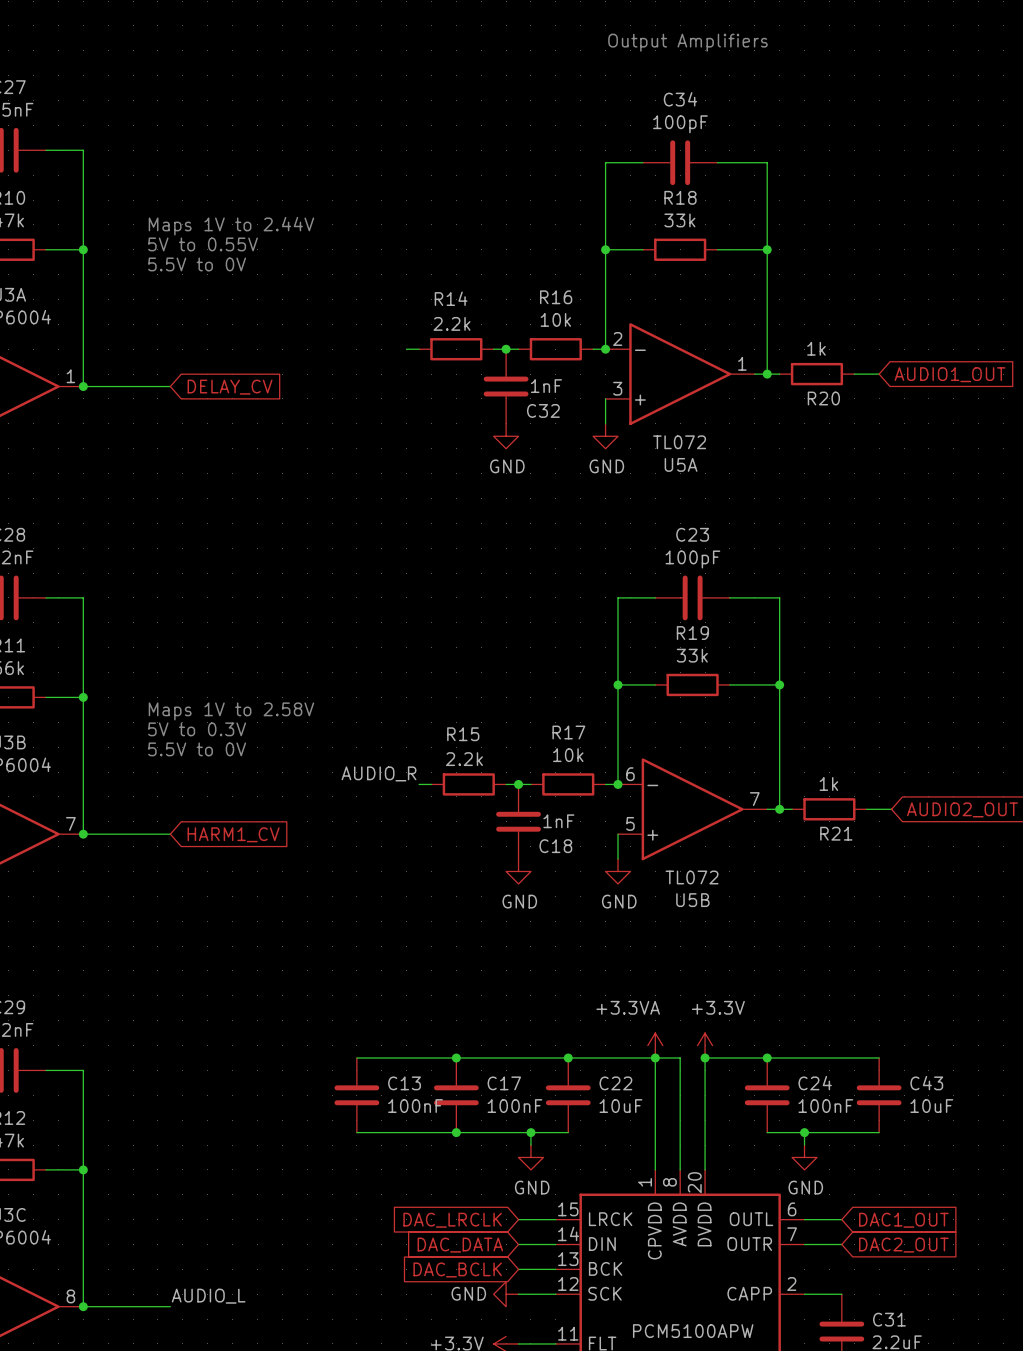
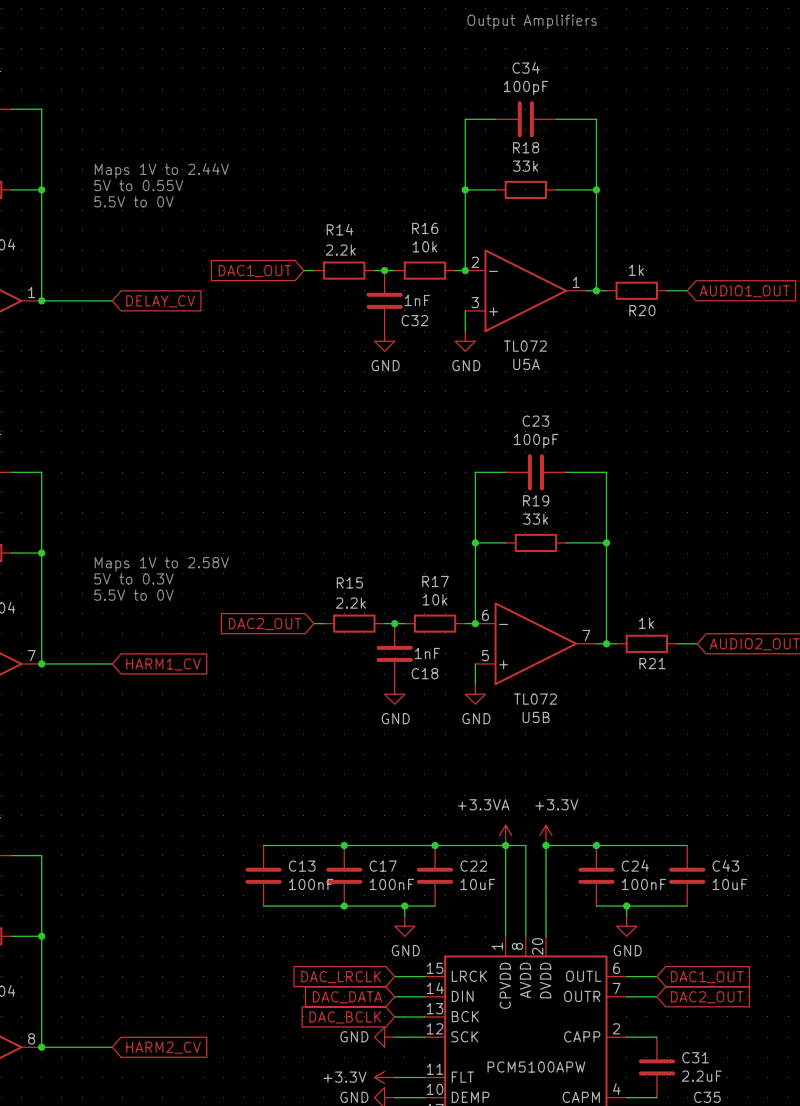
global label: none -> DAC1_OUT (255, 271)
label: AUDIO_R (379, 773) -> none
global label: none -> DAC2_OUT (265, 624)
label: AUDIO_L (208, 1296) -> none
global label: none -> HARM2_CV (163, 1047)

